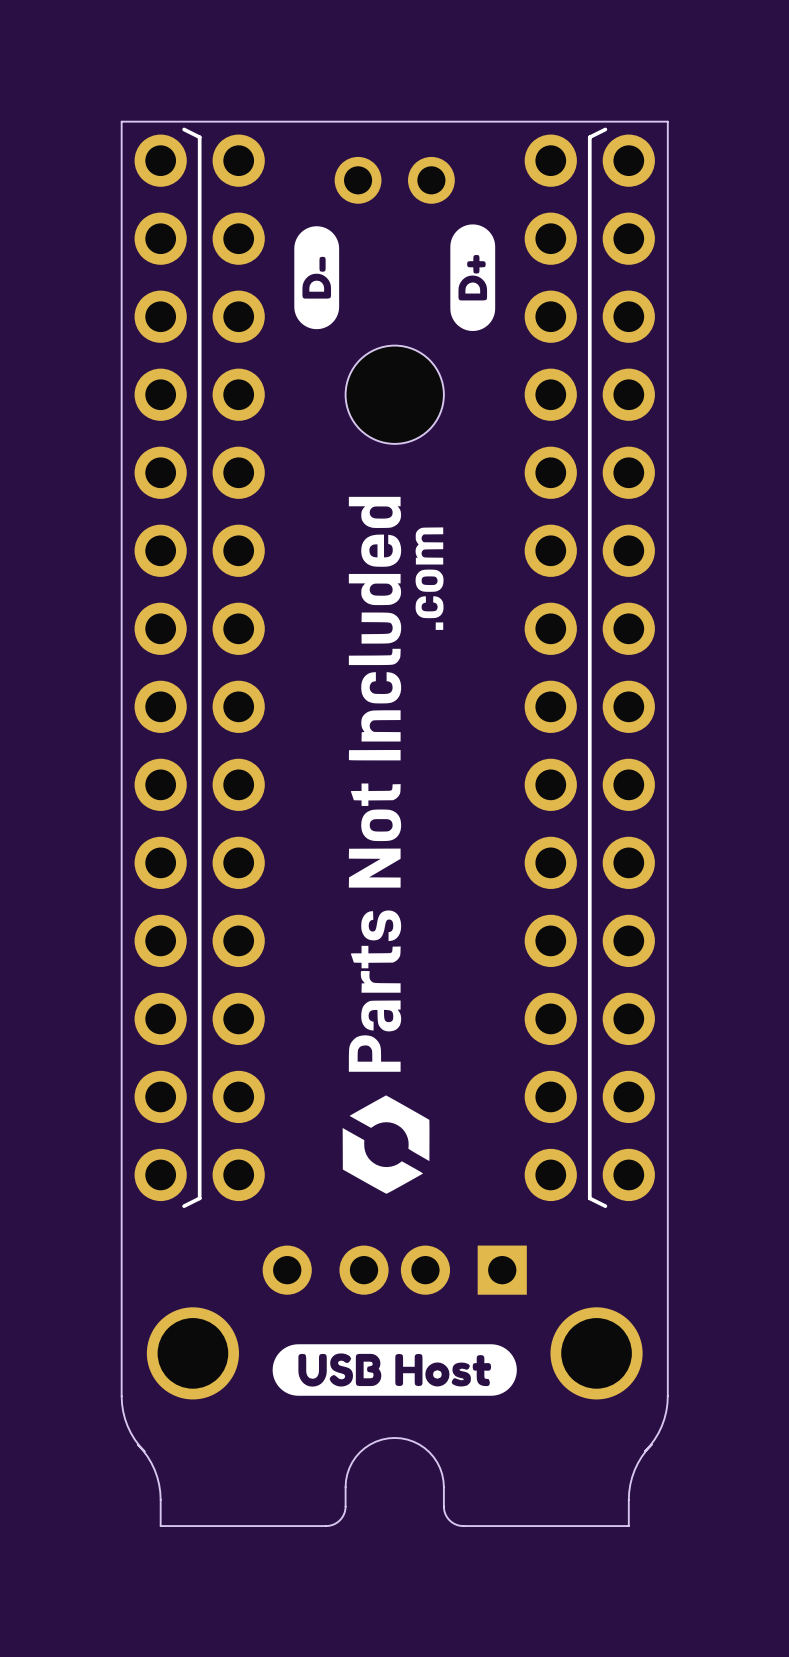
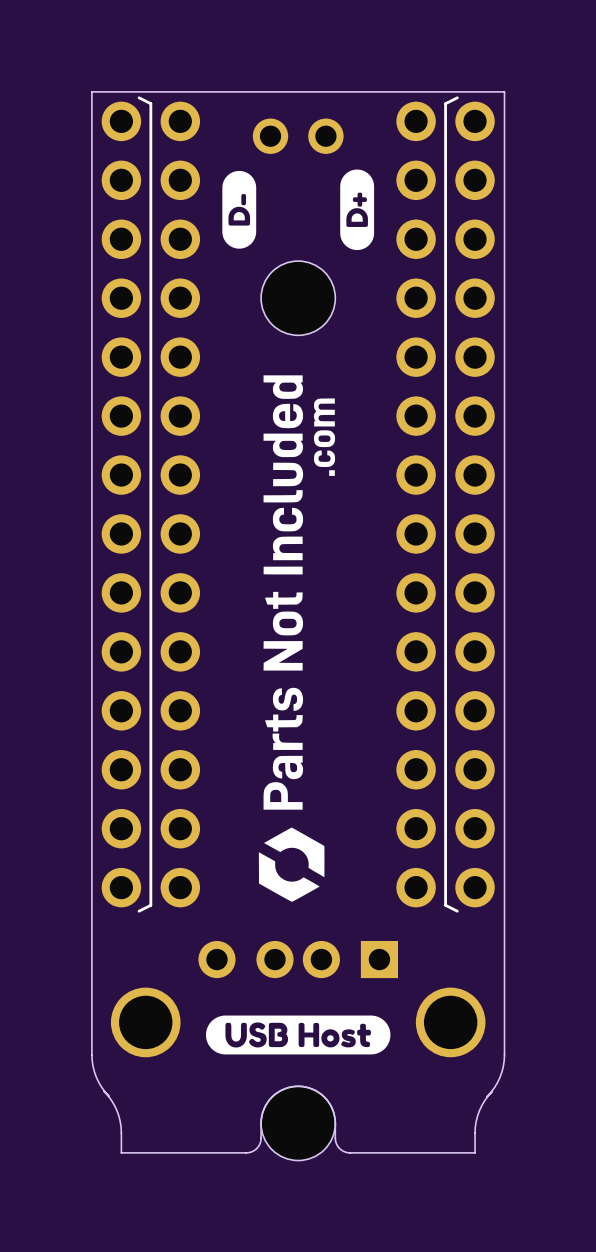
part: none -> (298, 1123)

